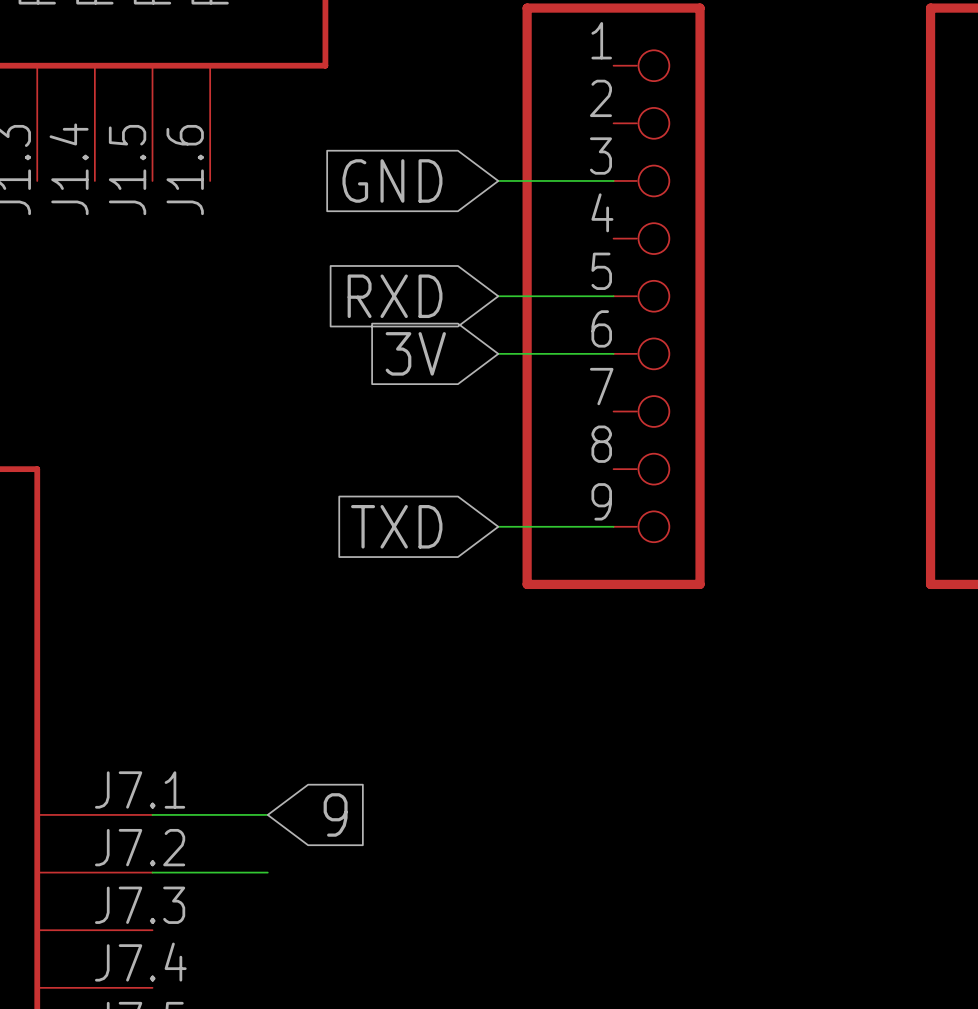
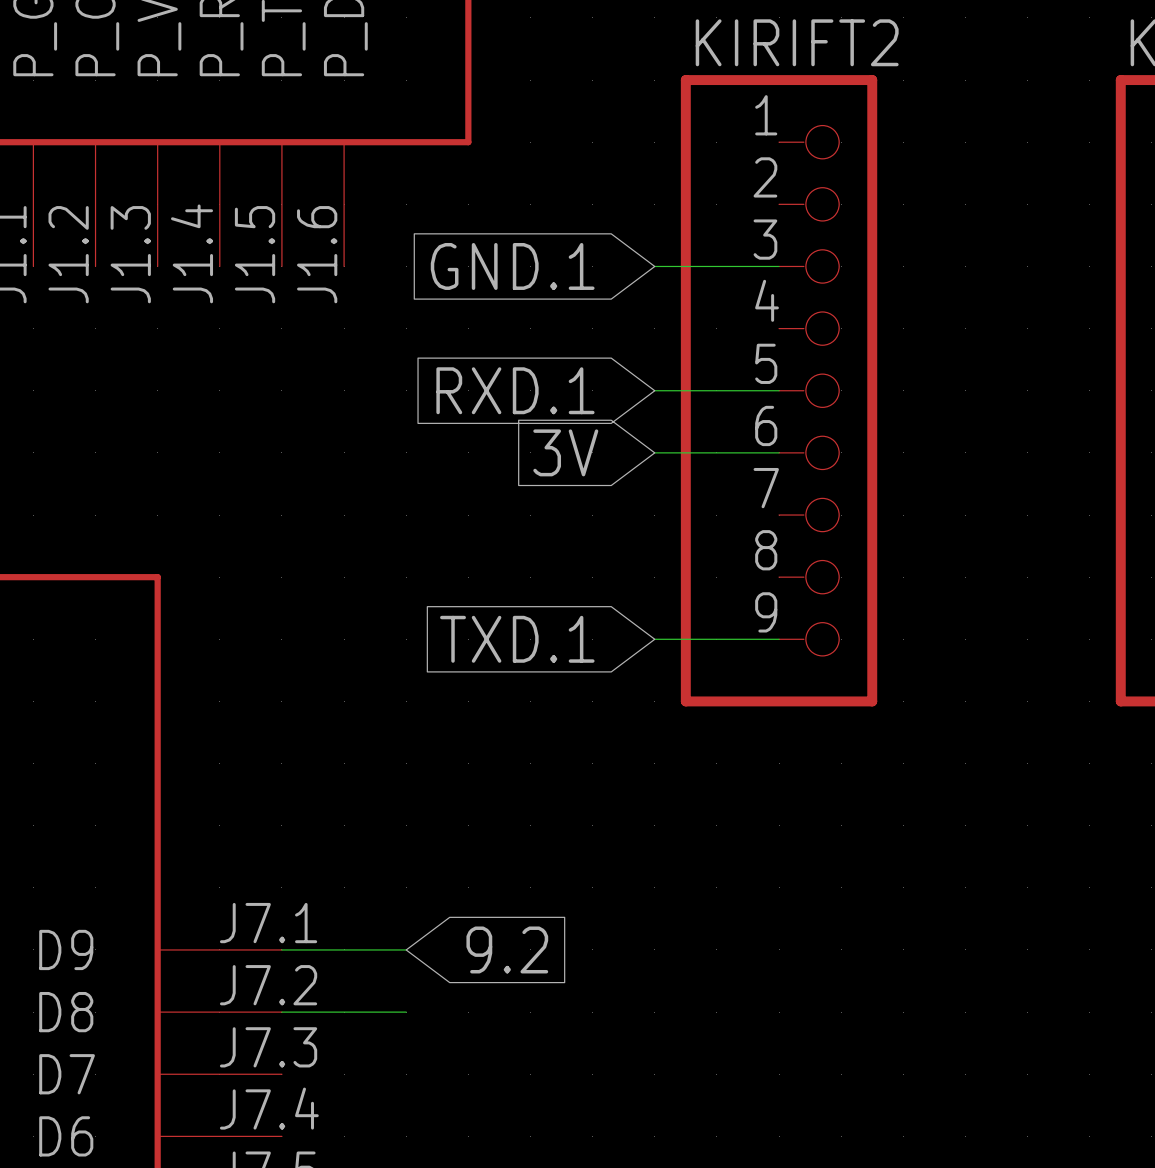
global label: GND (392, 180) -> GND.1 (512, 266)
global label: RXD (395, 296) -> RXD.1 (515, 390)
global label: TXD (396, 526) -> TXD.1 (517, 639)
global label: 9 (335, 814) -> 9.2 (507, 949)

